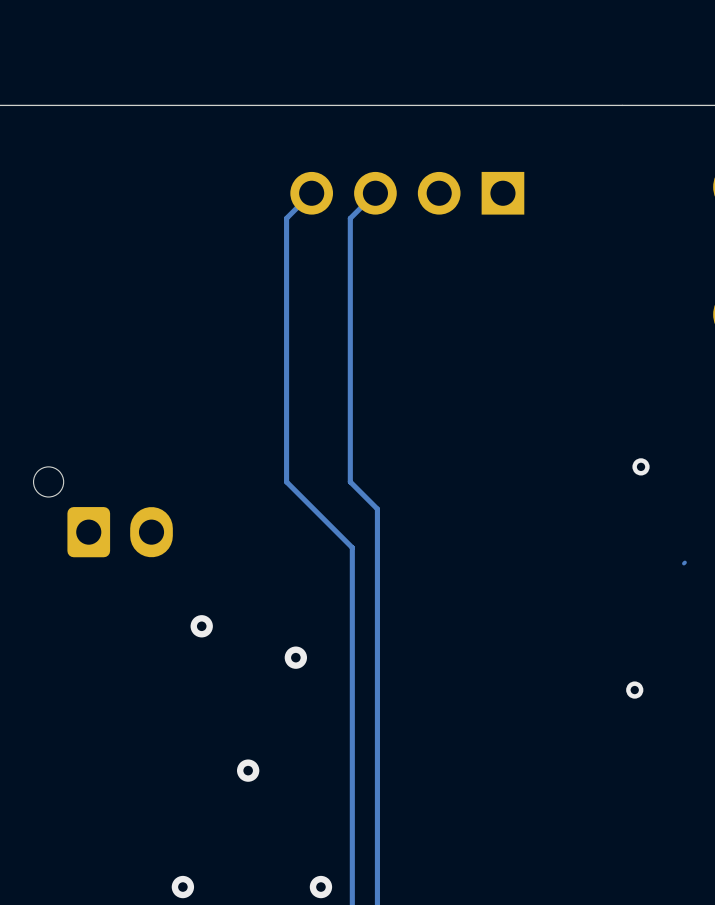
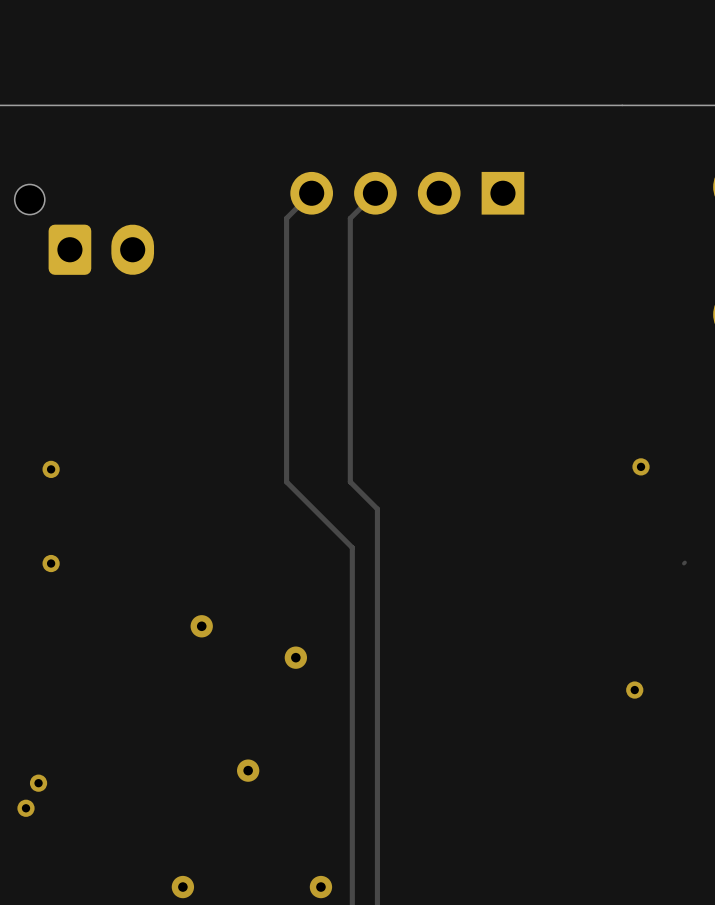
via: none -> (51, 469)
part position: (103, 512) -> (84, 229)
via: none -> (51, 563)
via: none -> (38, 783)
via: none -> (26, 808)

